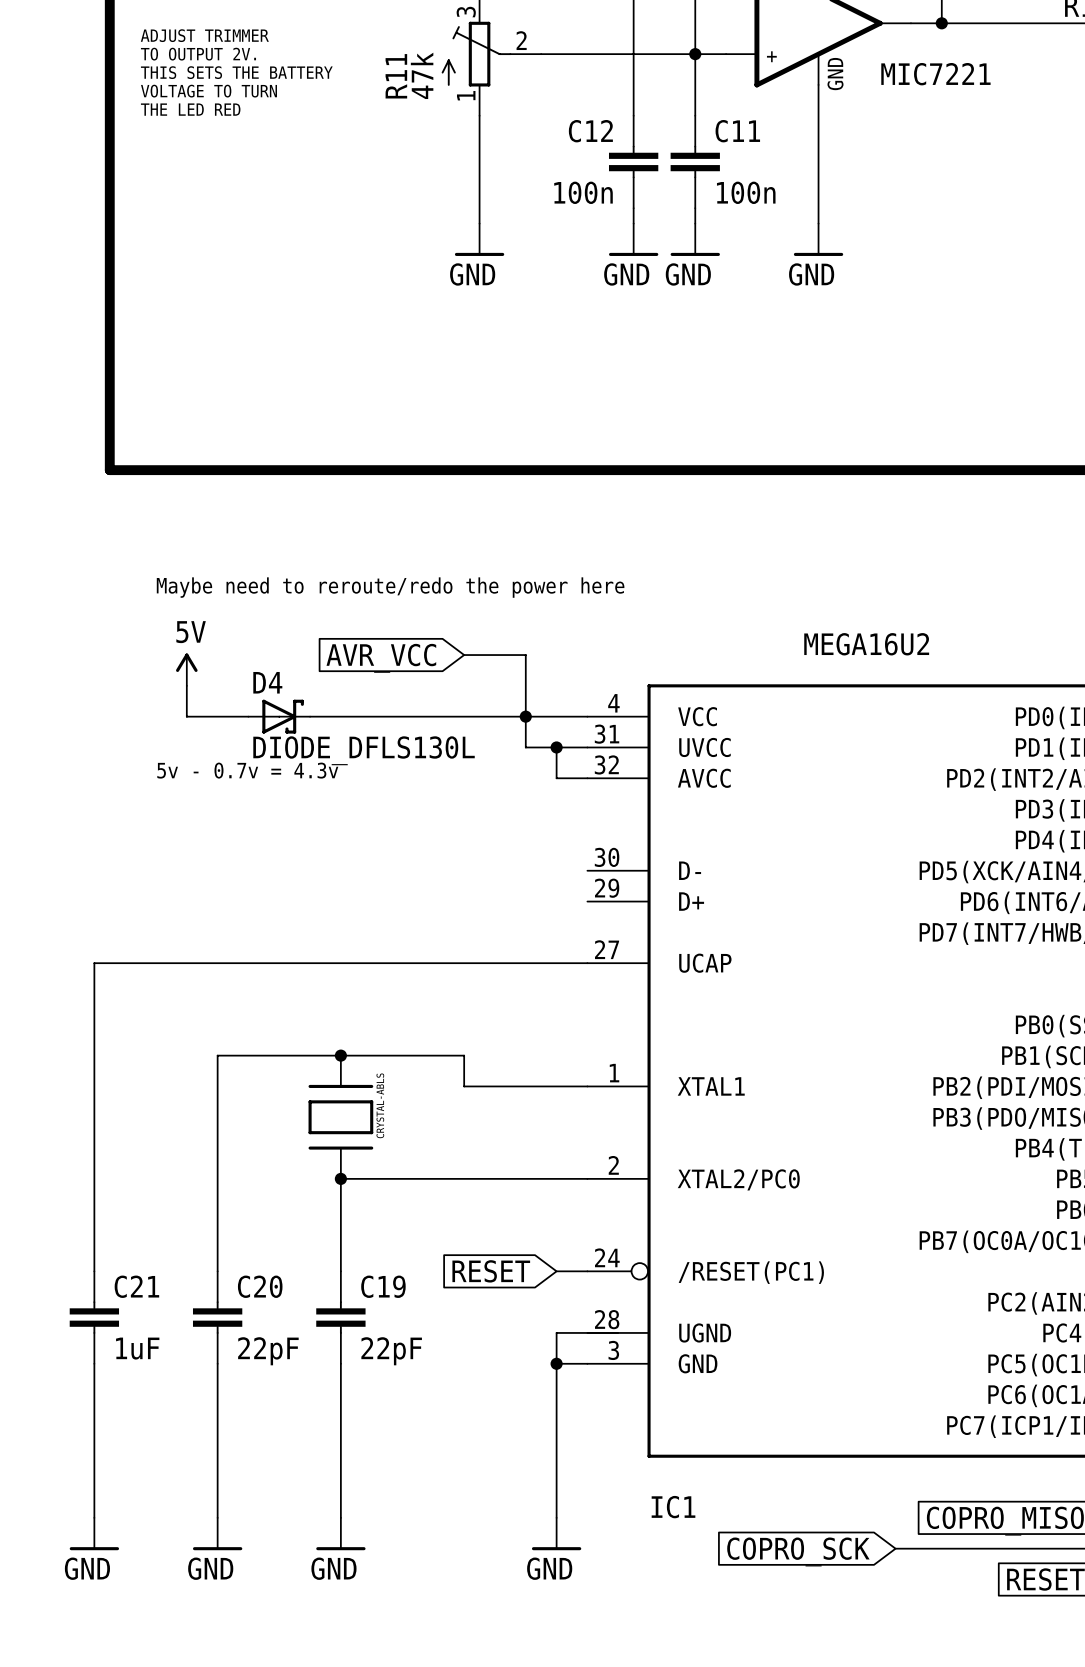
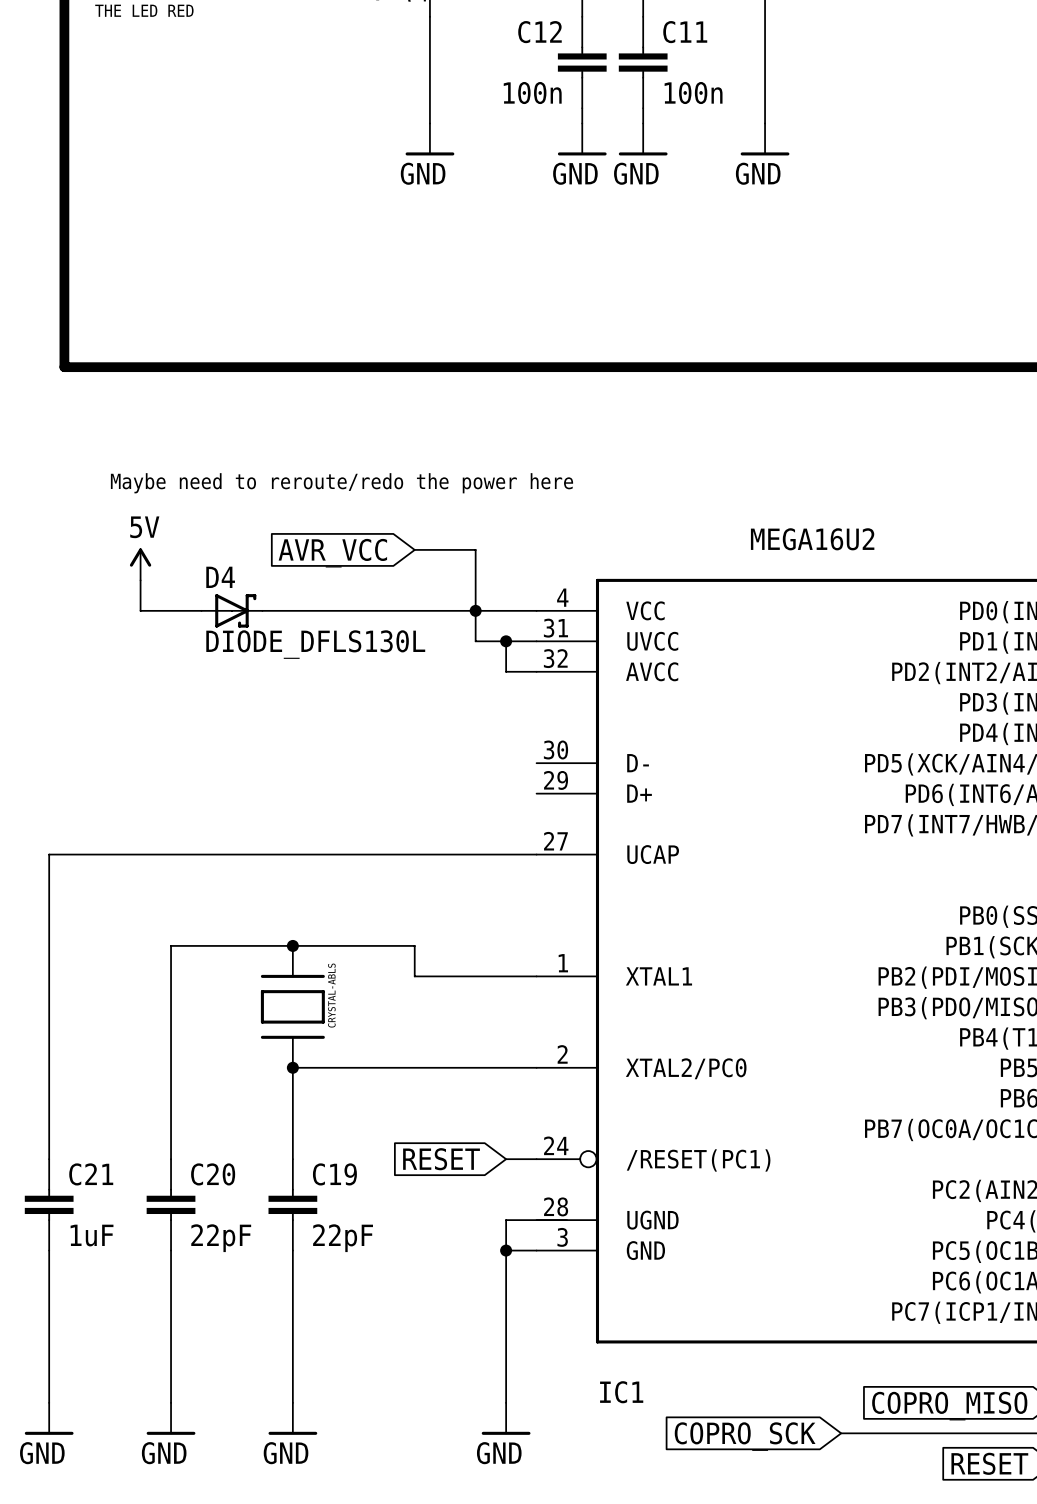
text: 5v - 0.7v = 4.3v (247, 770) -> none

